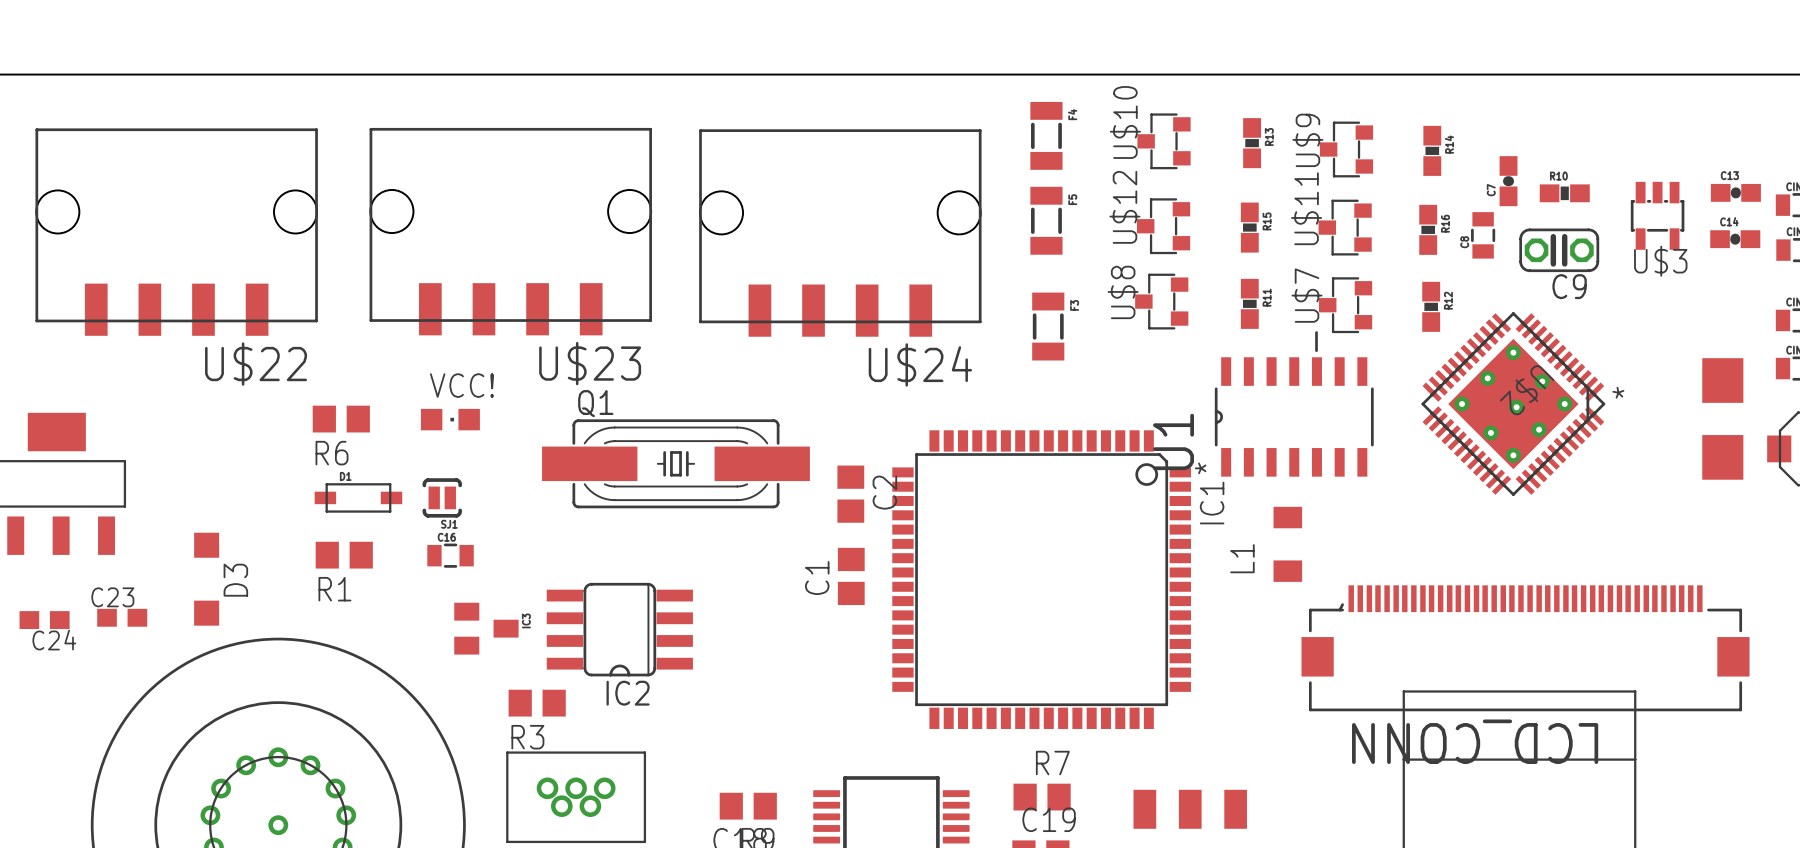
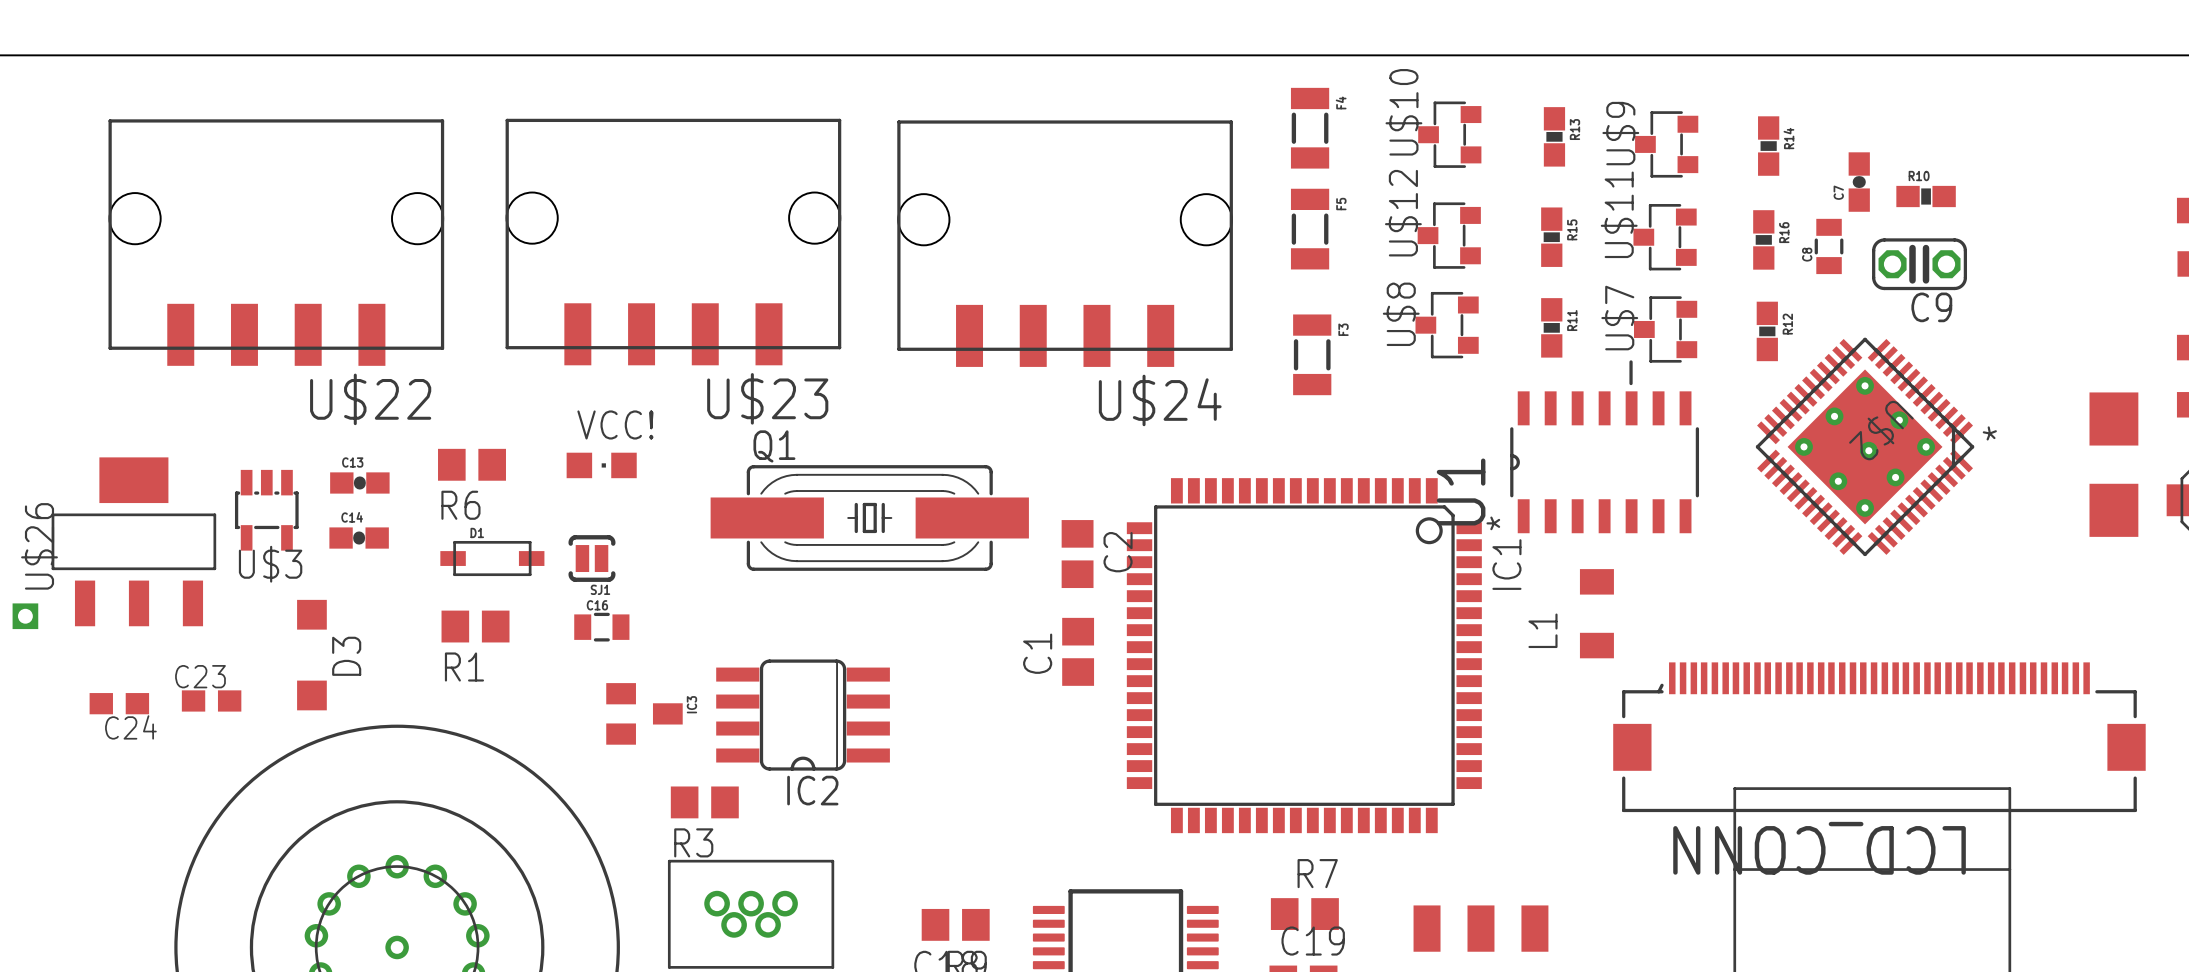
C13 position: (1735, 192) -> (359, 482)
U$3 position: (1657, 215) -> (266, 510)
C14 position: (1735, 239) -> (359, 538)

